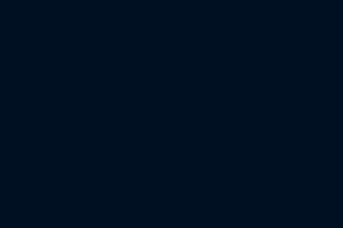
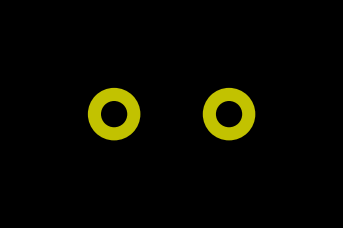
part: none -> (171, 114)

